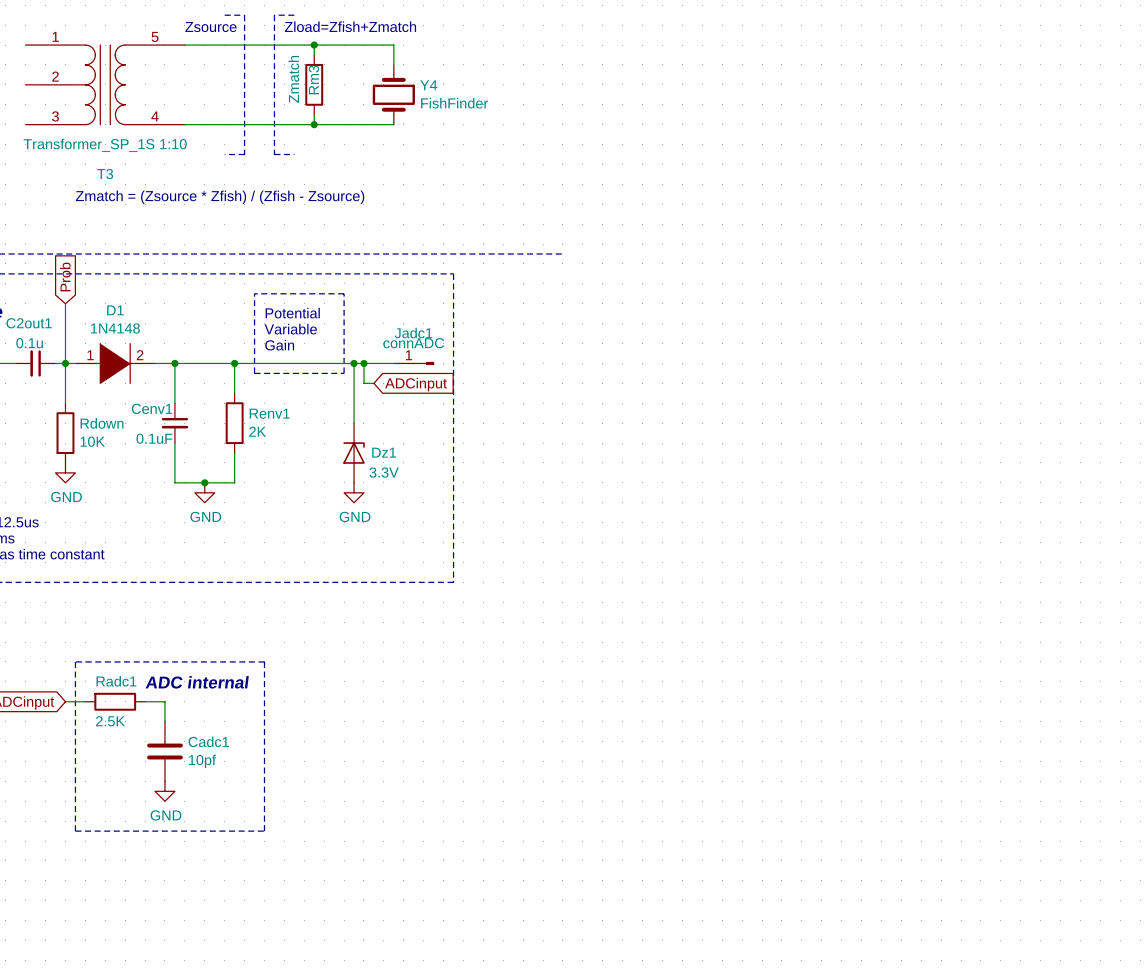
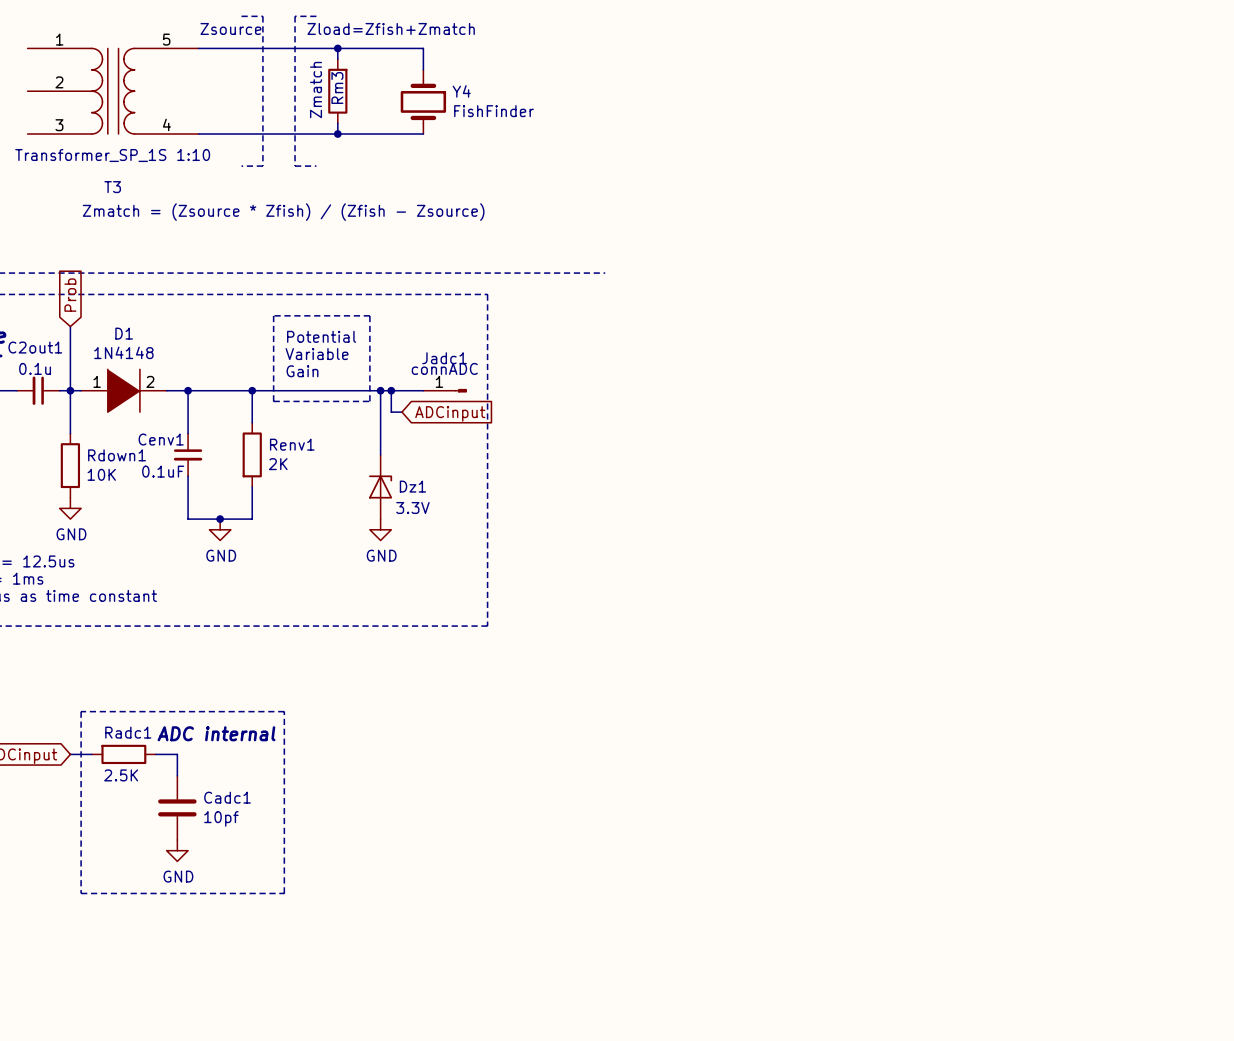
Rdown name: Rdown (102, 423) -> Rdown1 (117, 455)

